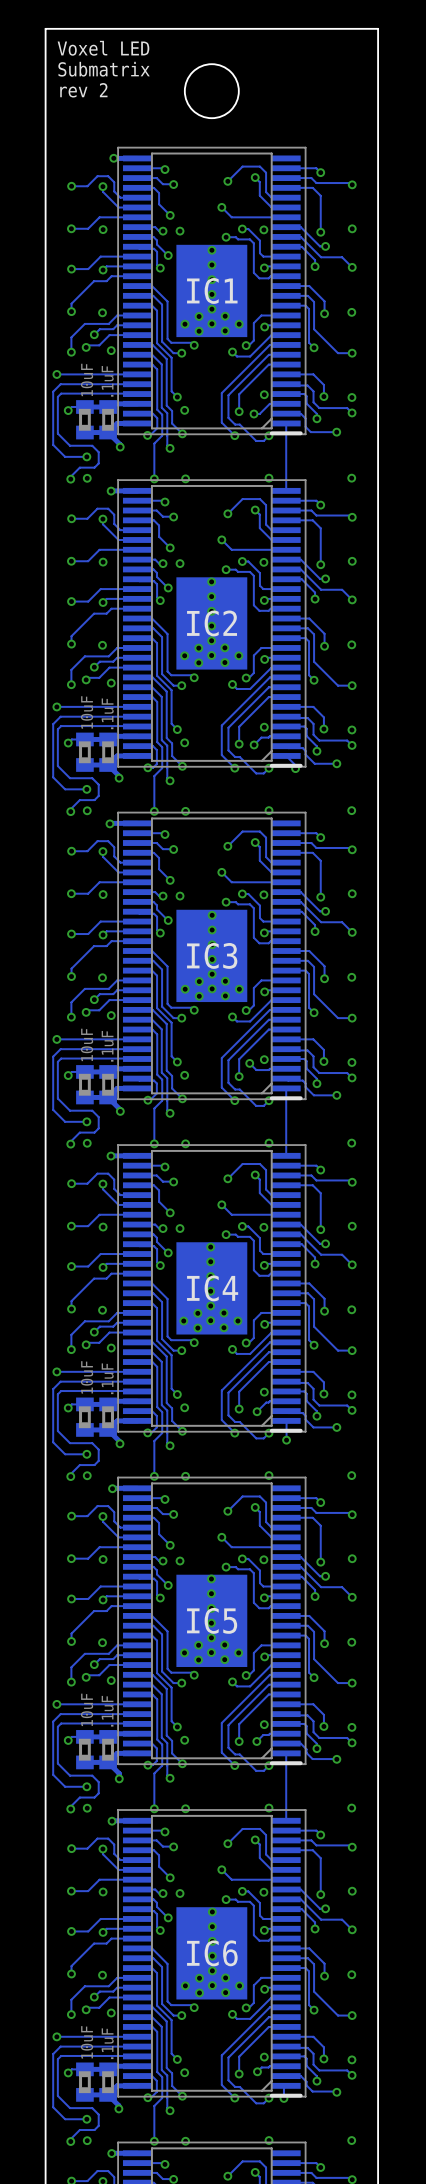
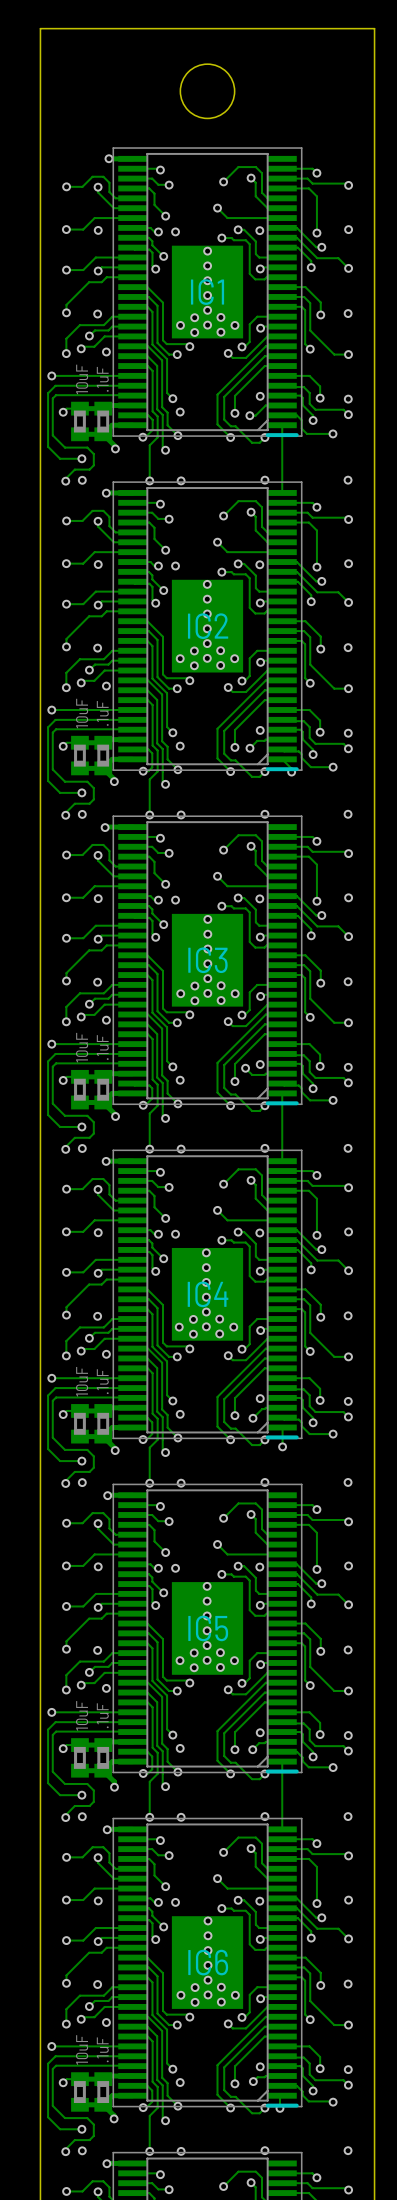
text: Voxel LED (103, 48) -> none
text: Submatrix (104, 69) -> none
text: rev 2 (83, 90) -> none

